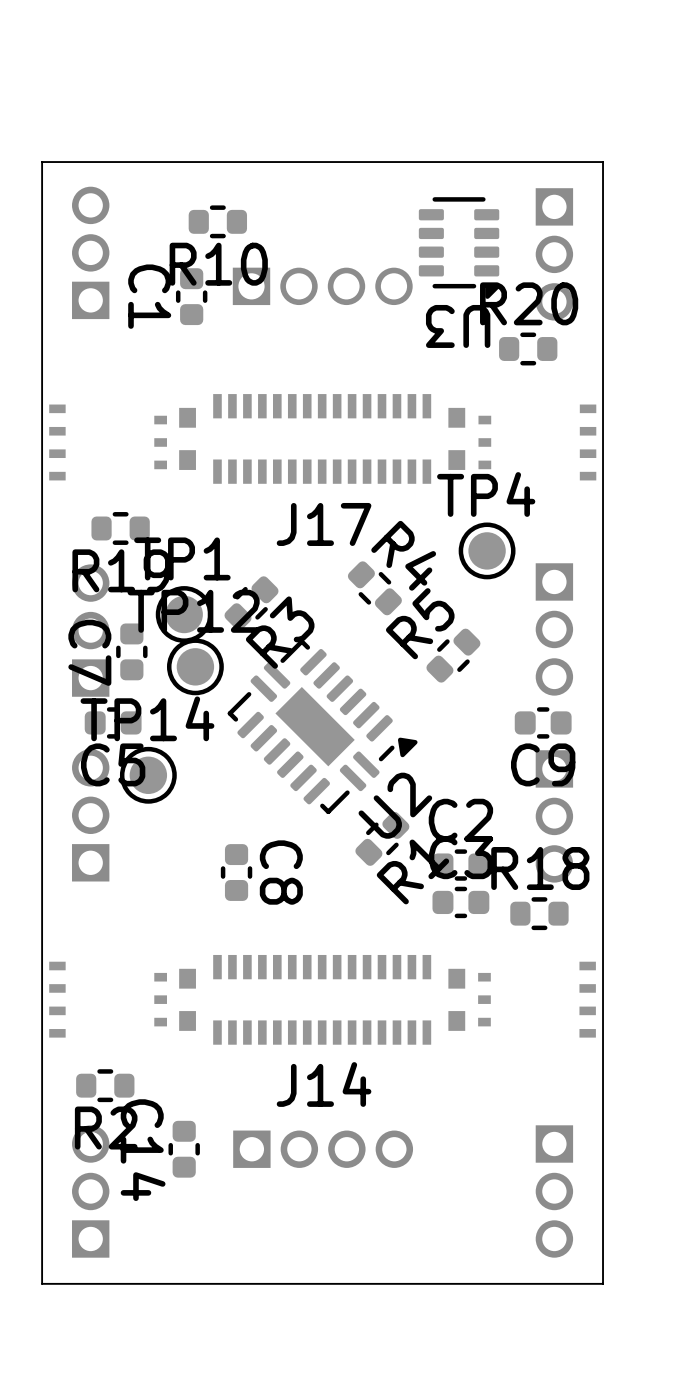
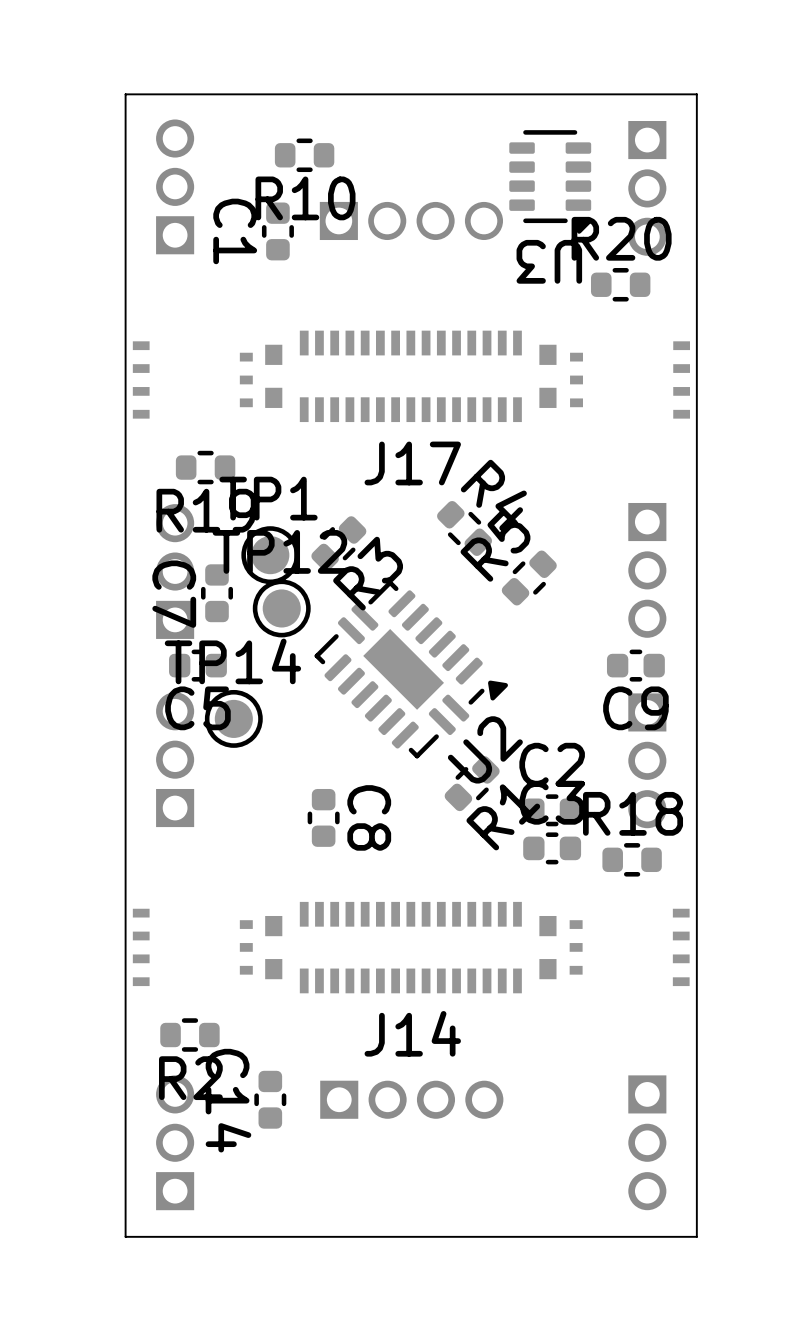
TP4: (487, 550) -> none
R5 position: (453, 655) -> (529, 578)

